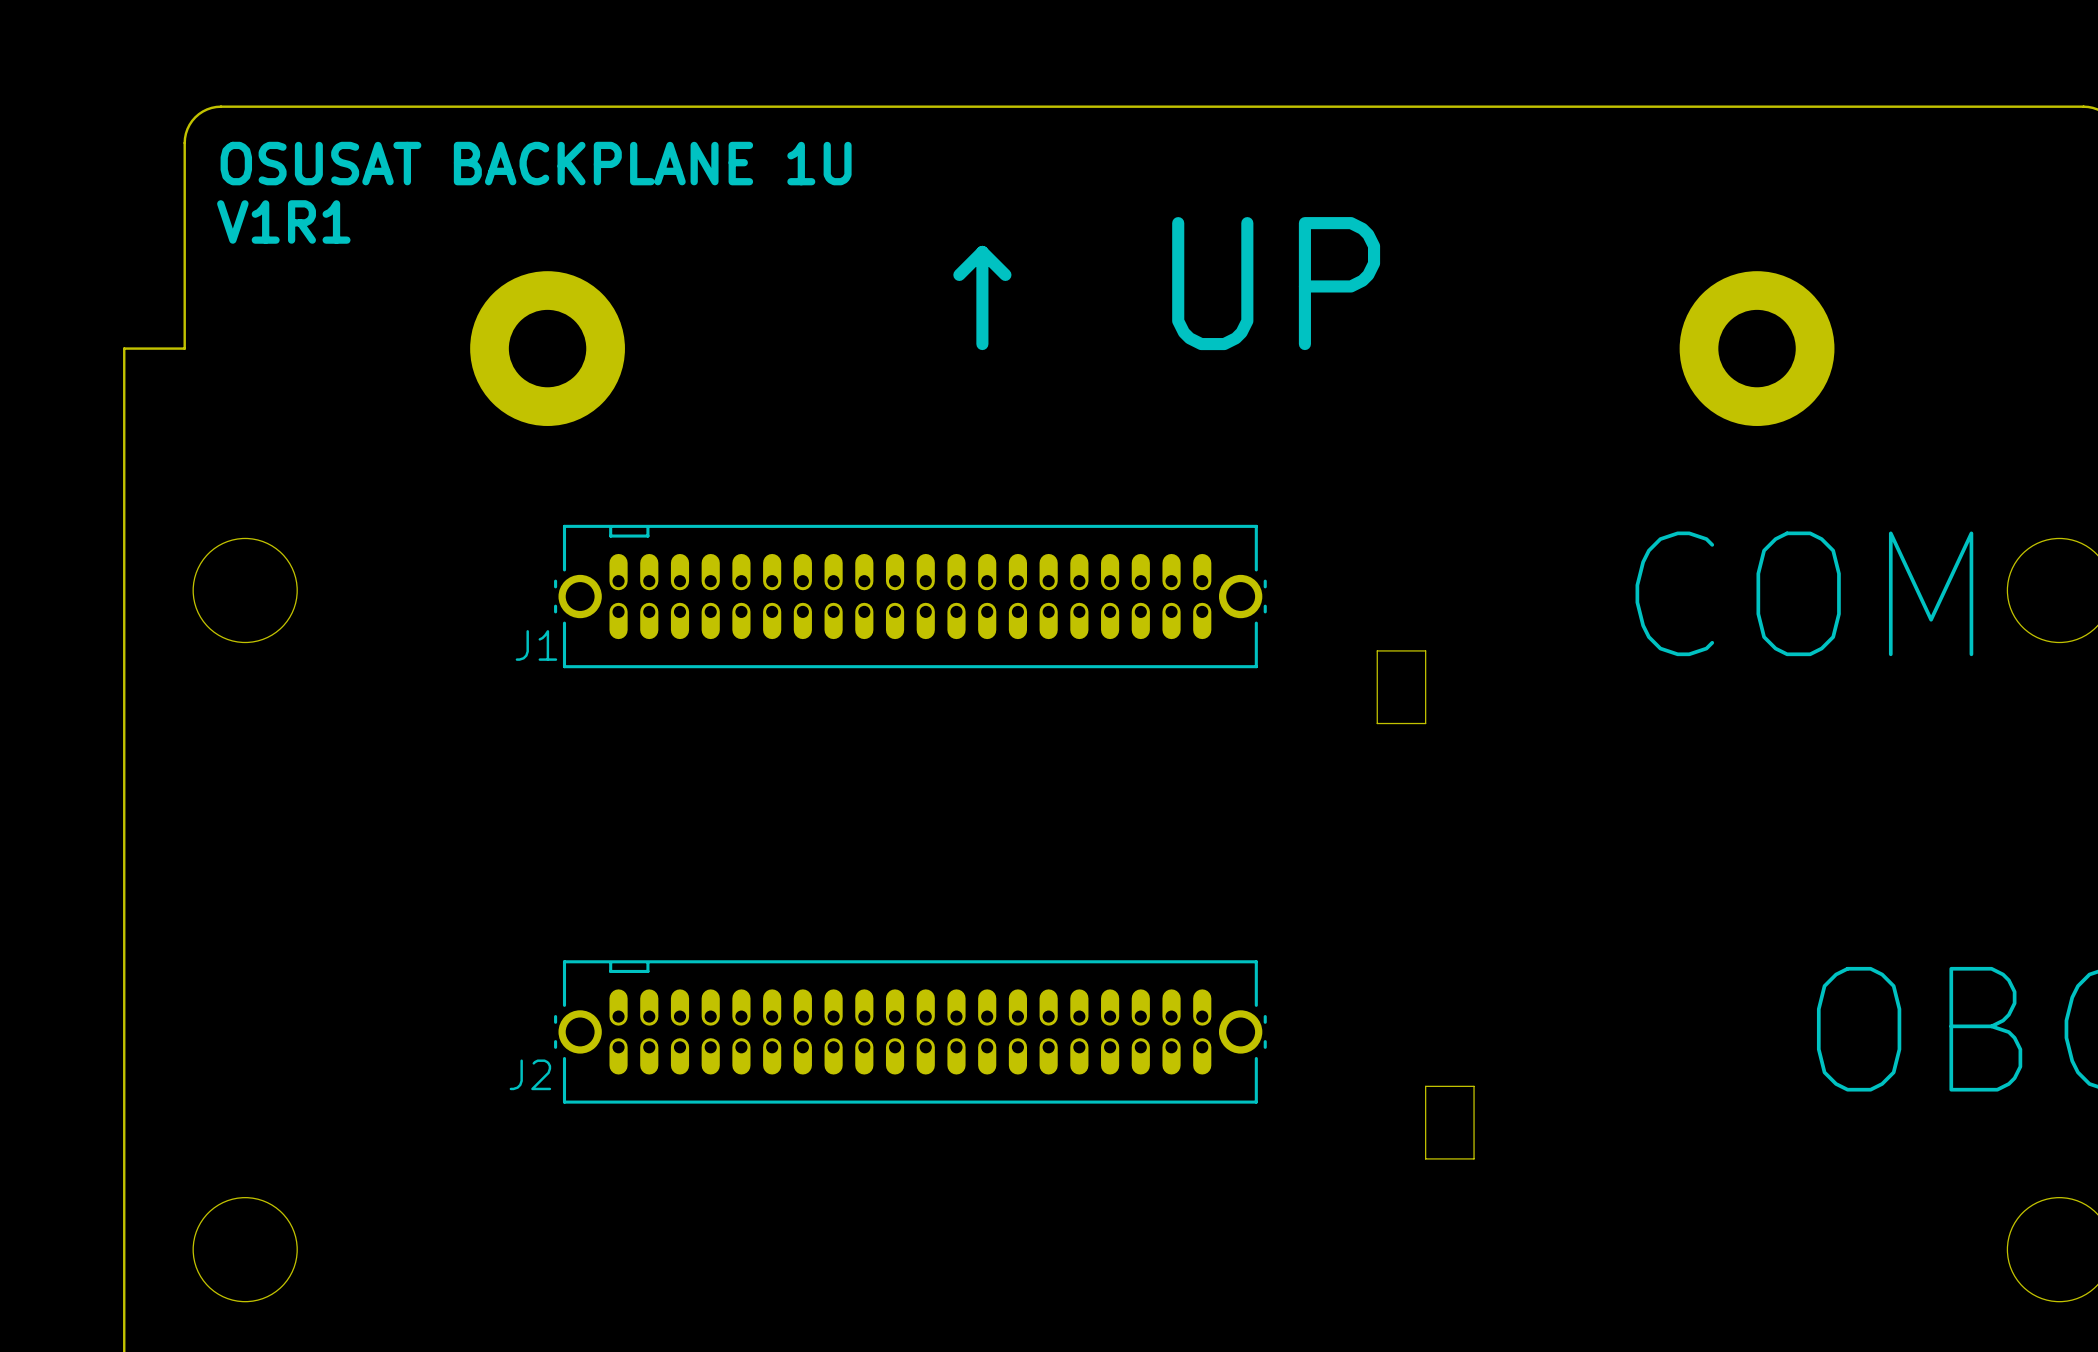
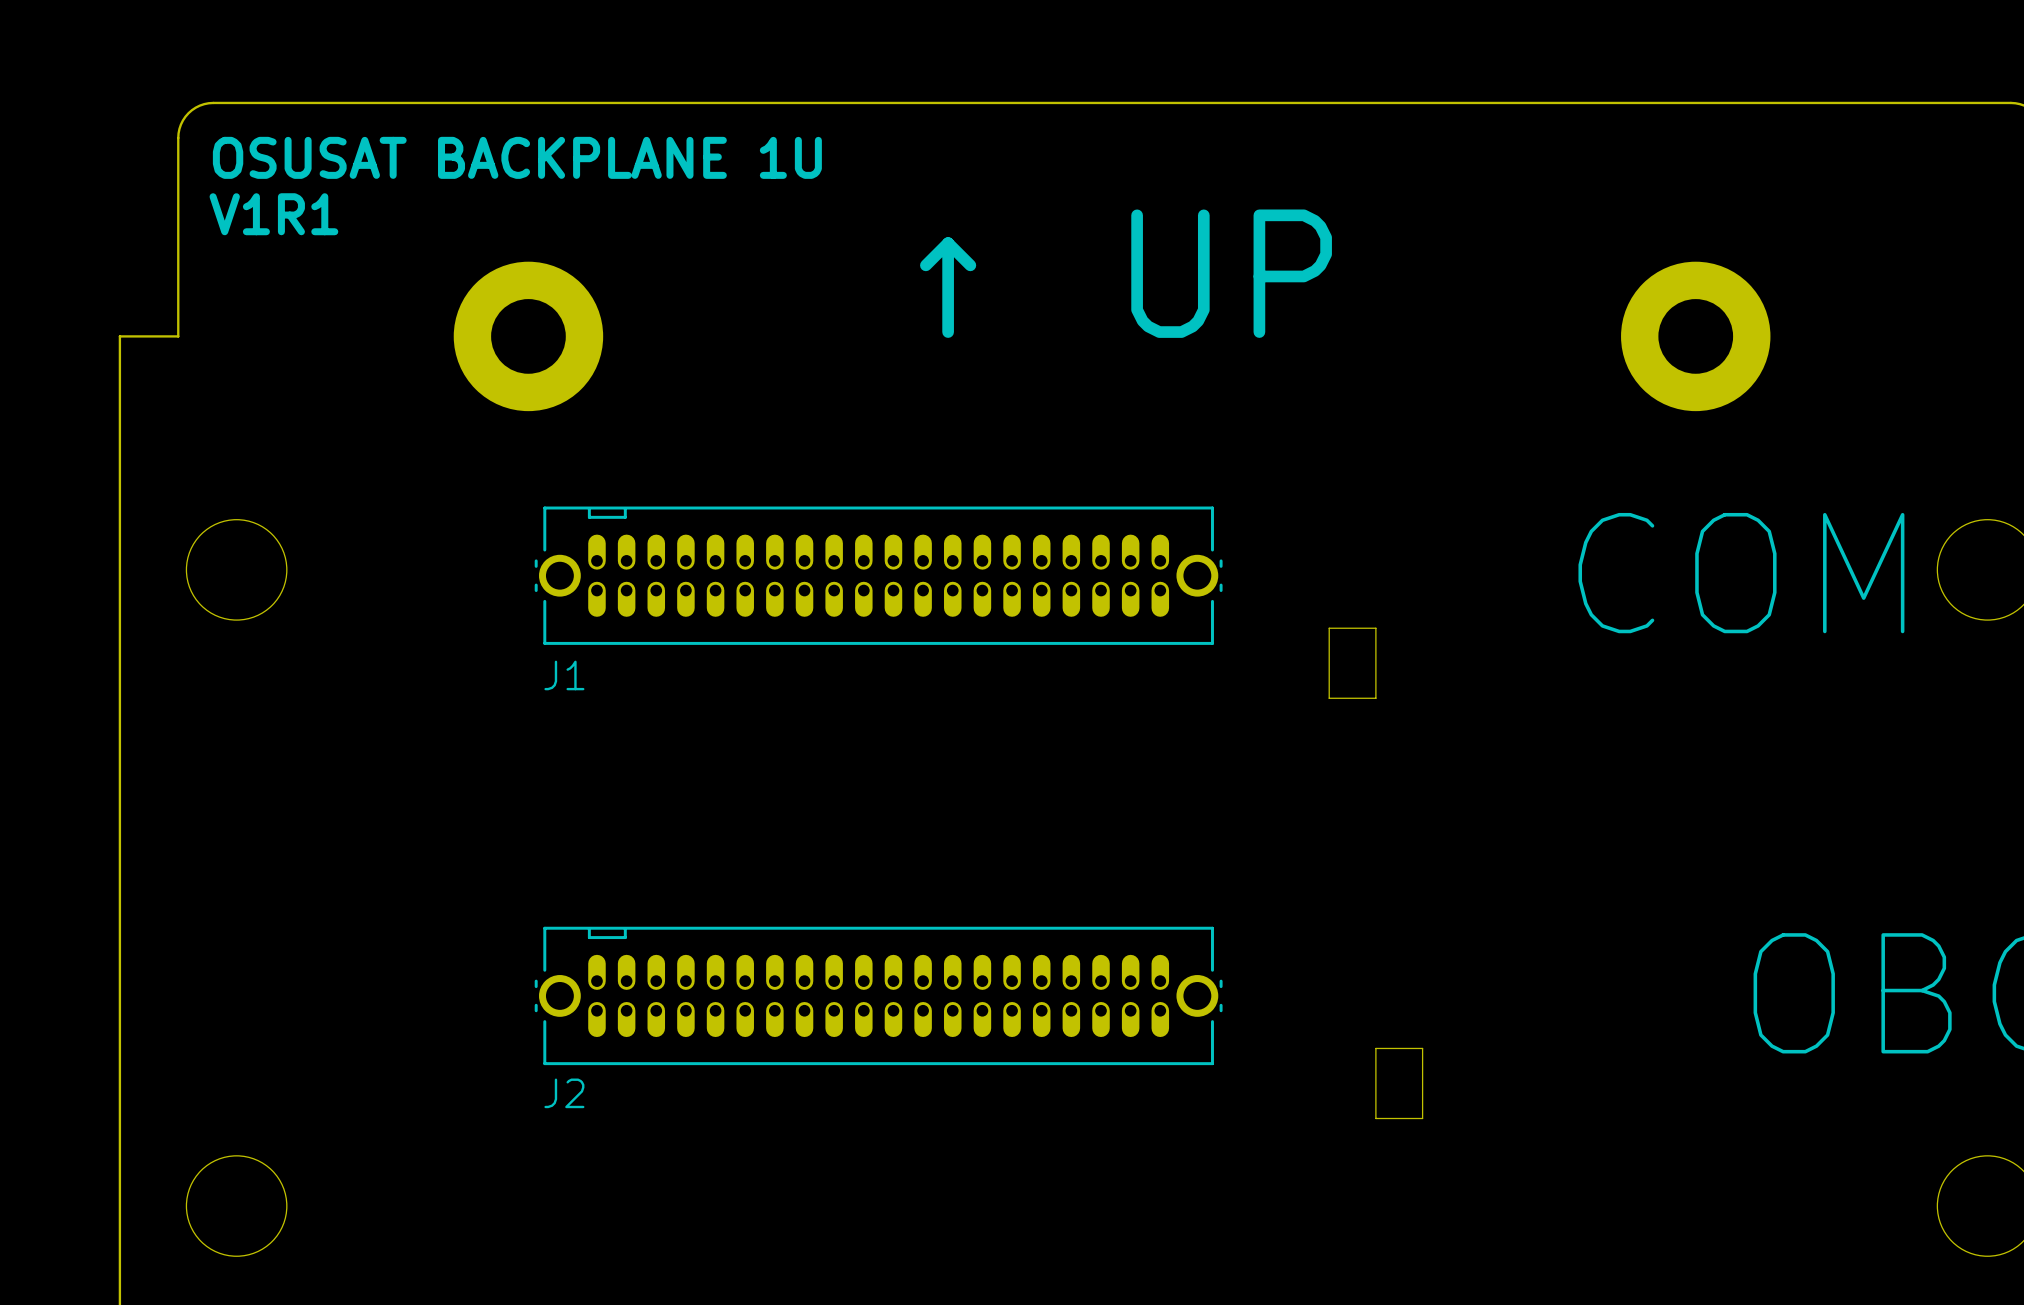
J1 name position: J1 (536, 645) -> J1 (564, 675)
J2 name position: J2 (530, 1074) -> J2 (564, 1093)

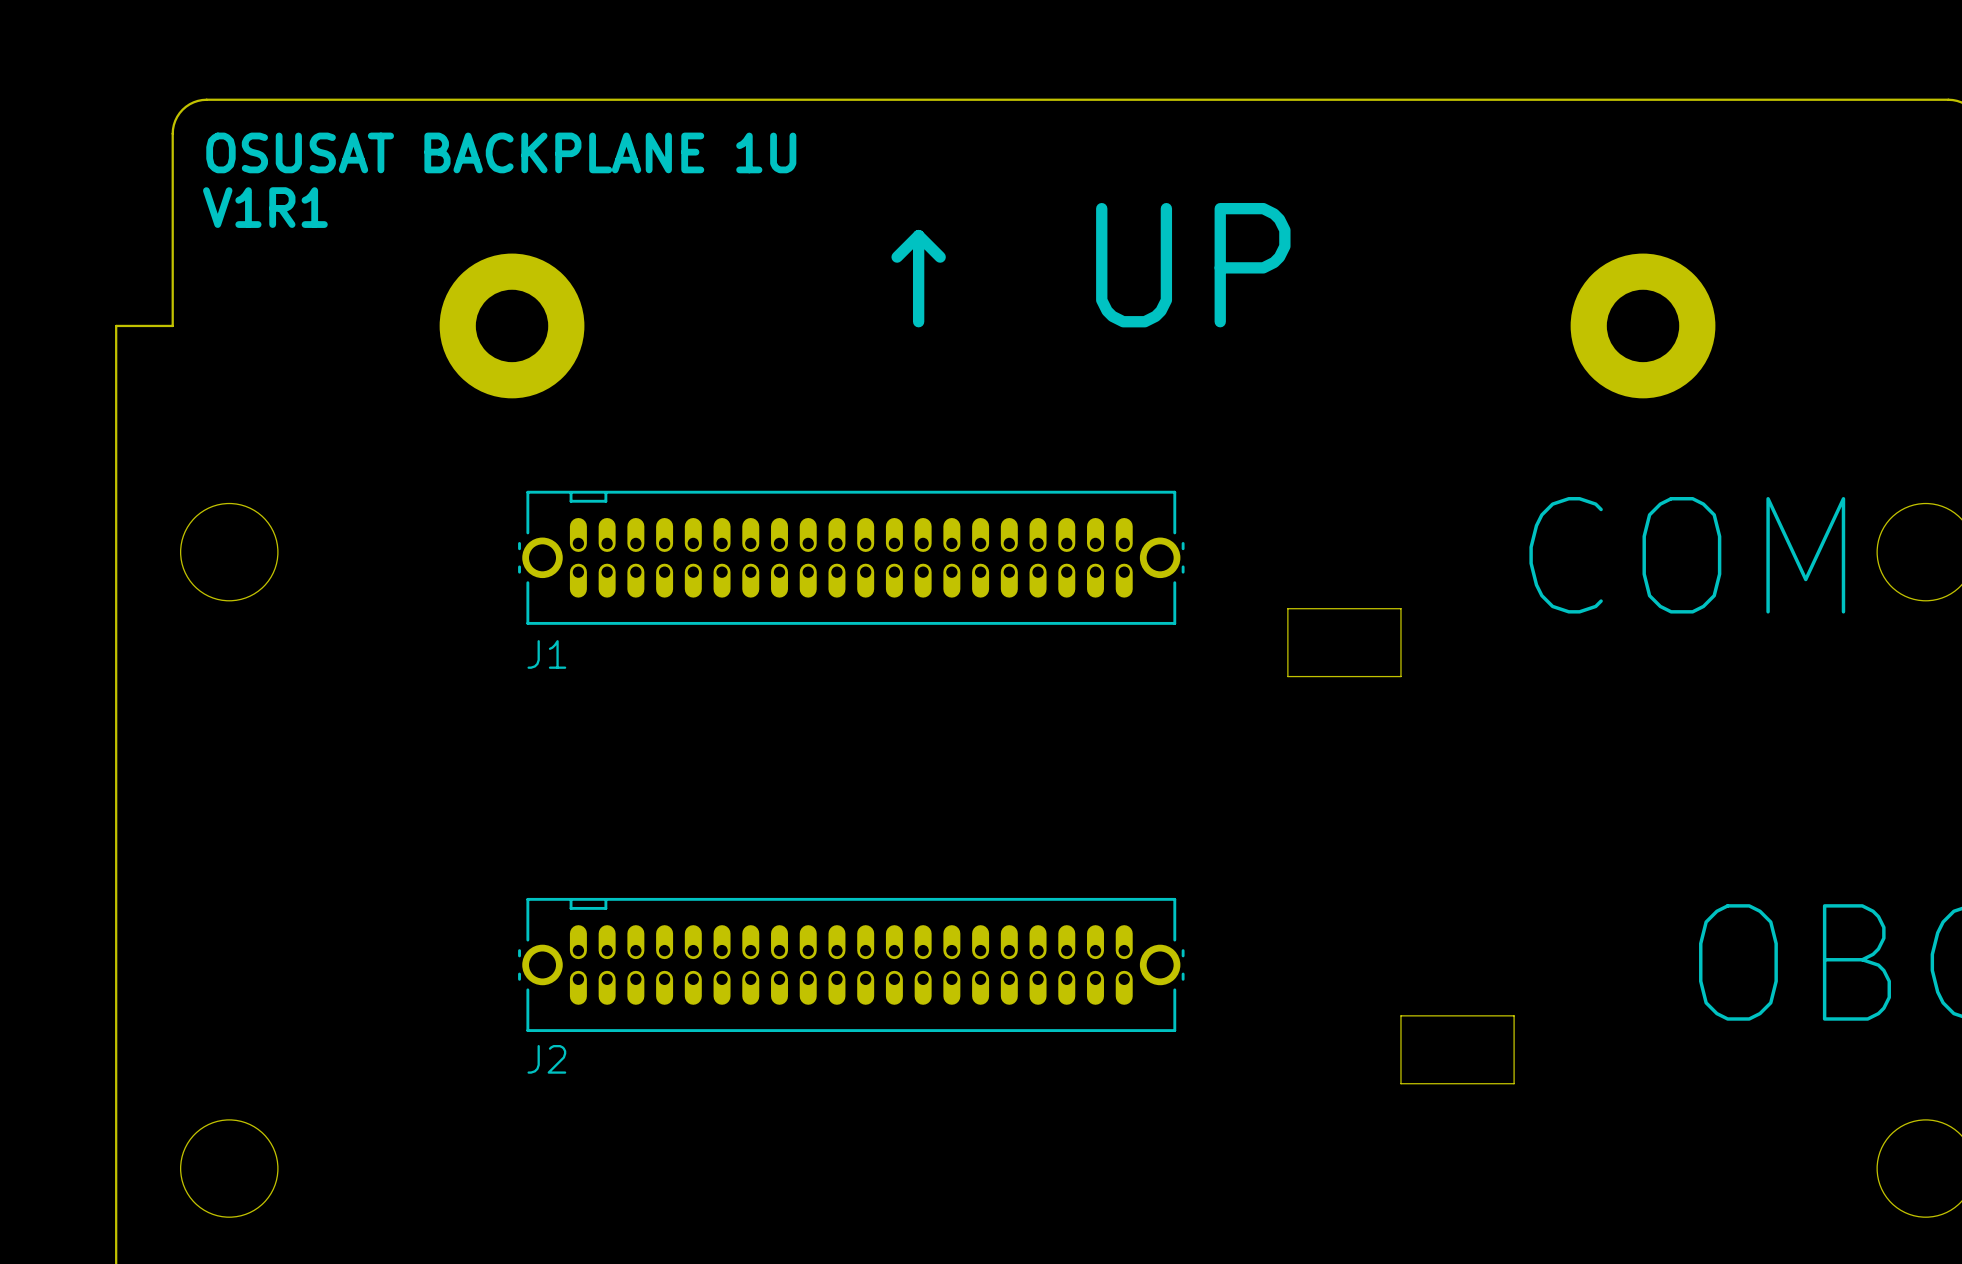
board edge: (1375, 628) (1375, 698) -> (1333, 608) (1400, 608) (1400, 676) (1333, 676)
board edge: (1375, 1048) (1375, 1118) (1422, 1118) (1422, 1048) (1375, 1048) -> none
board edge: none -> (1400, 1015) (1400, 1083) (1514, 1083) (1514, 1015) (1400, 1015)

